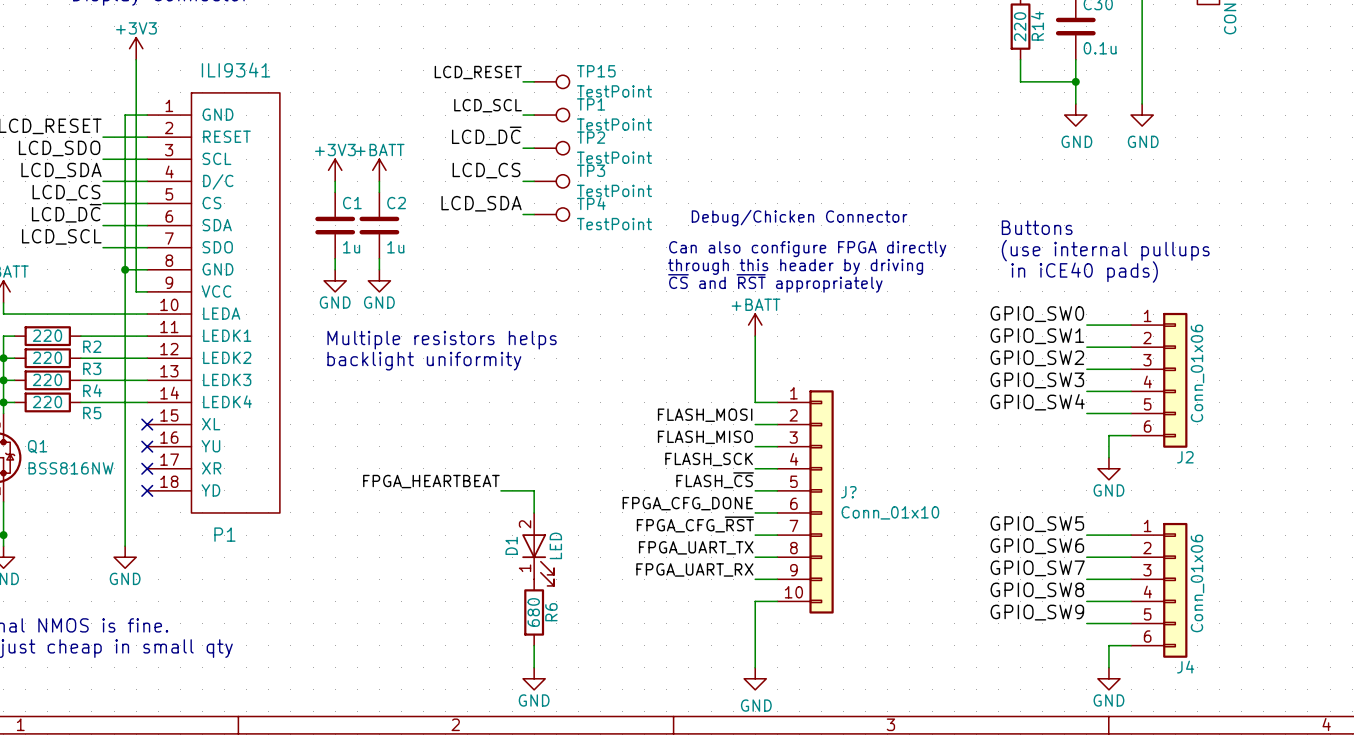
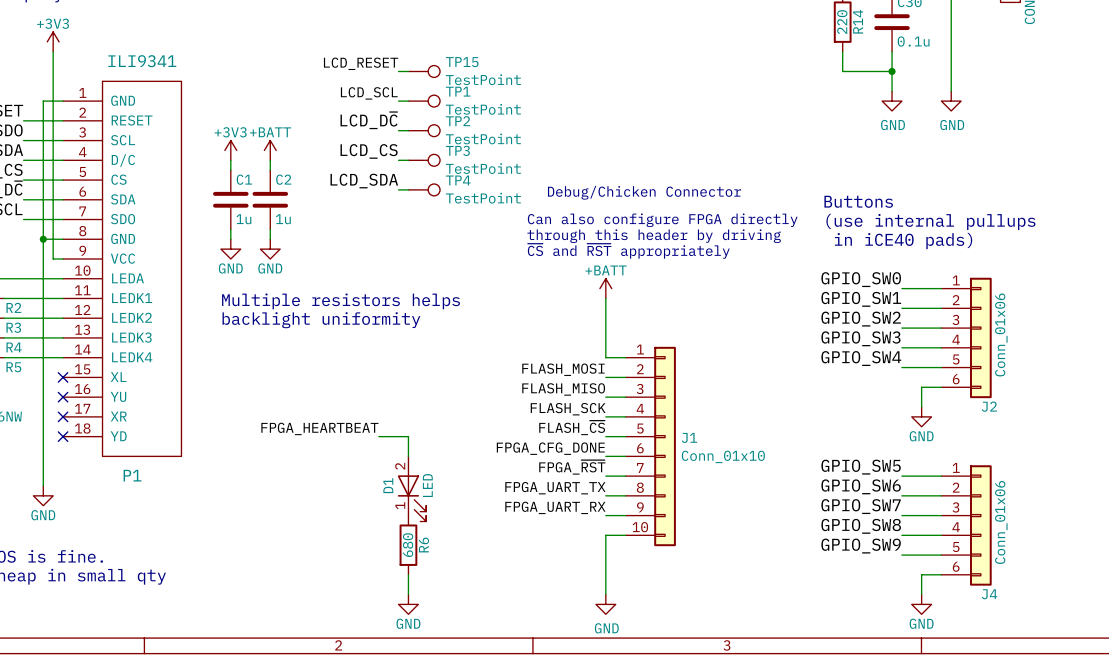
J? name: J? (848, 492) -> J1 (689, 437)
label: FPGA_CFG_~{RST} (695, 524) -> FPGA_~{RST} (572, 467)

